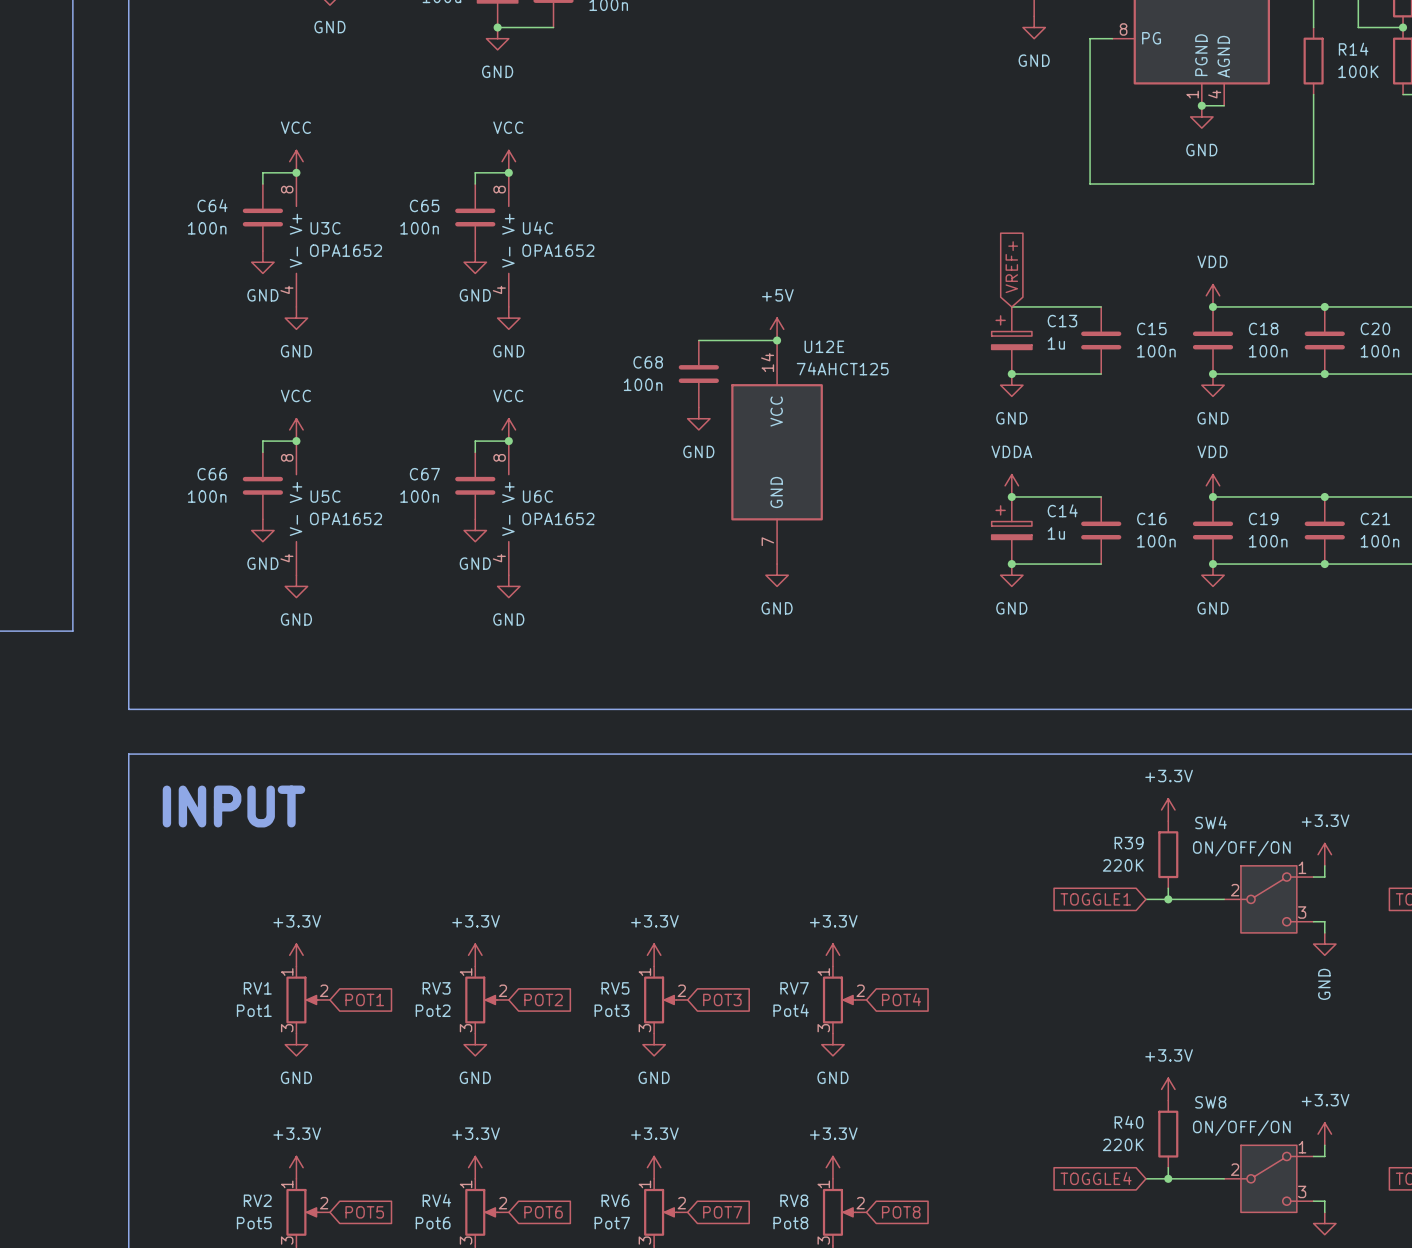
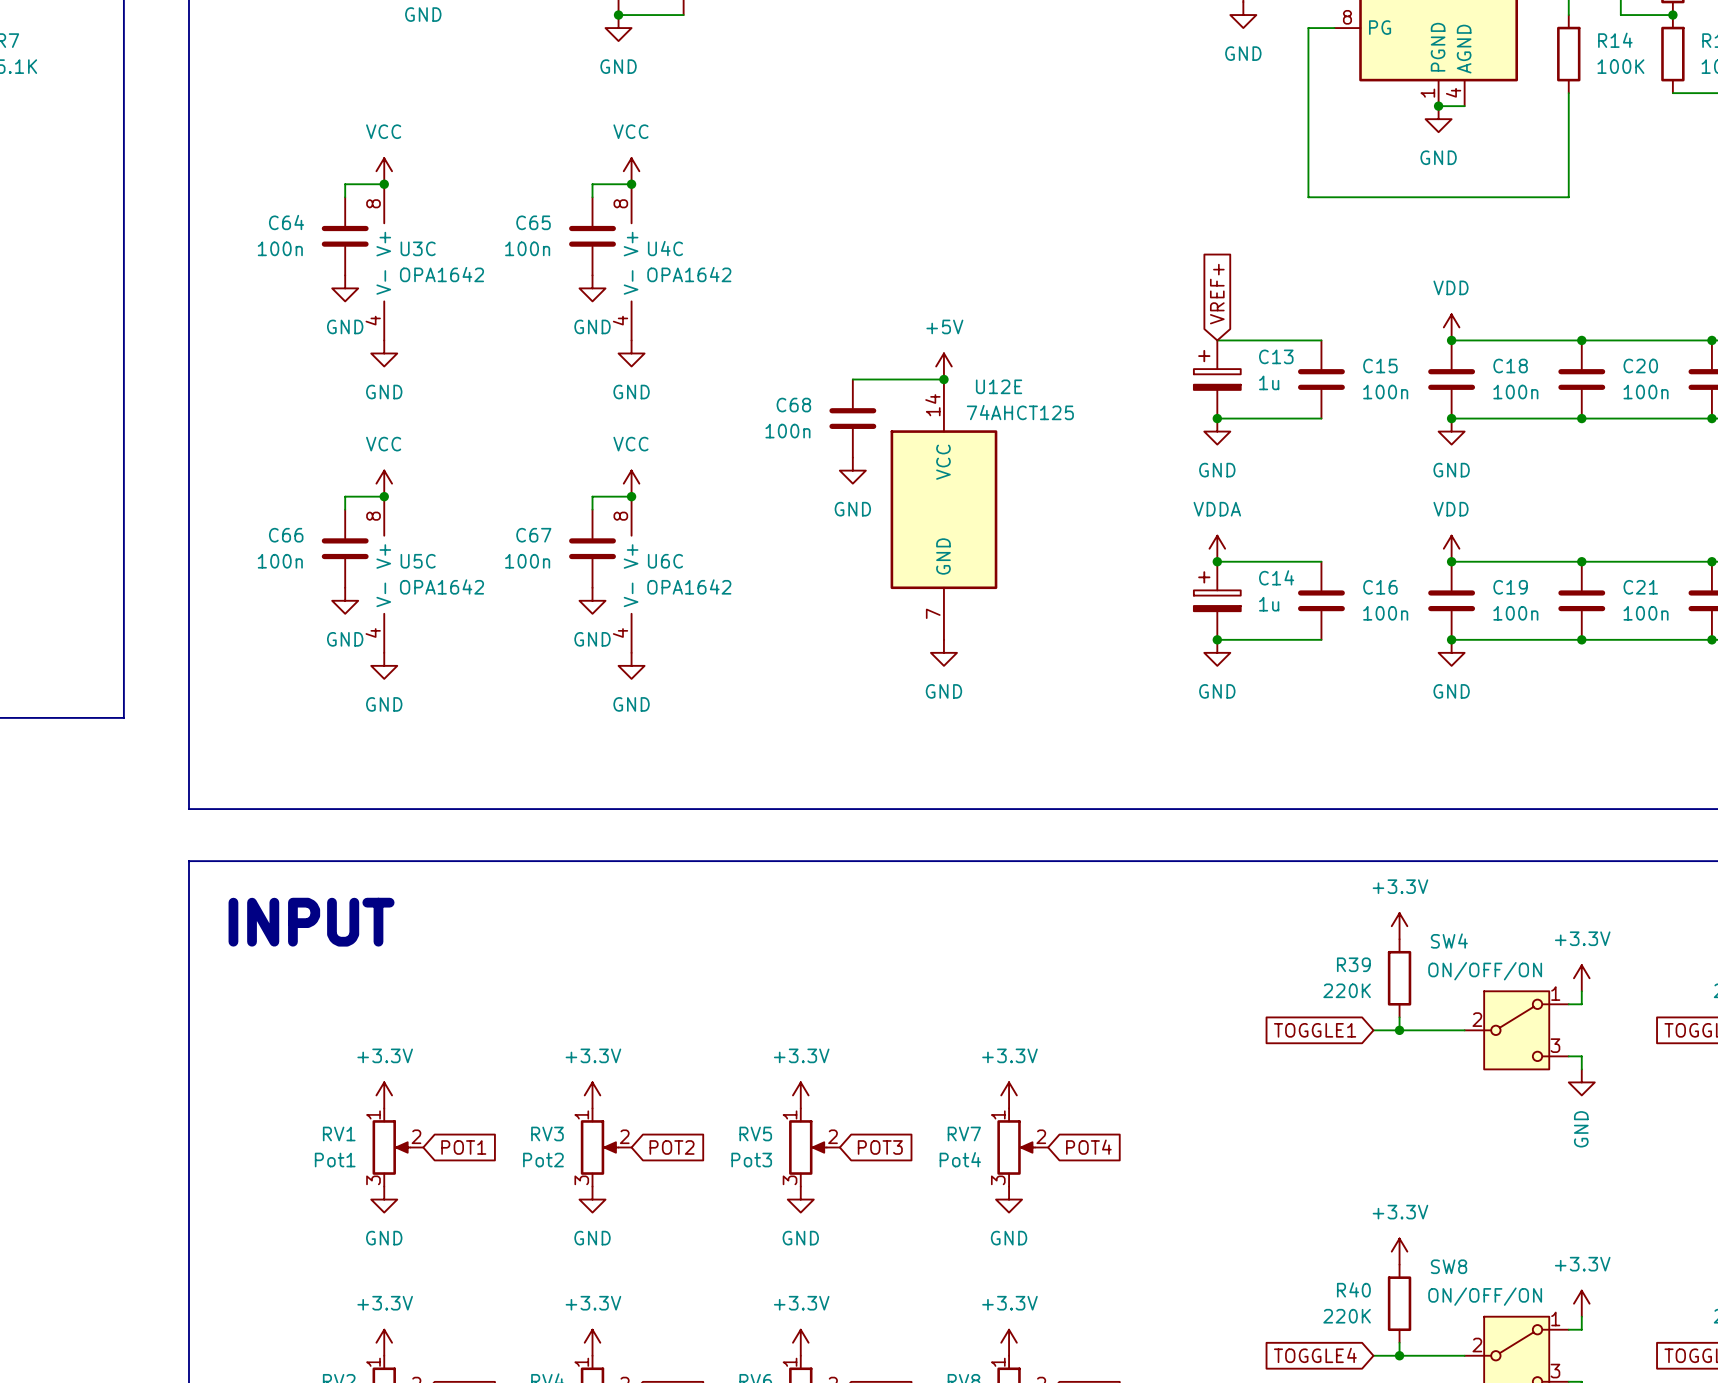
U3C value: OPA1652 (346, 250) -> OPA1642 (441, 274)
U4C value: OPA1652 (558, 250) -> OPA1642 (689, 274)
U5C value: OPA1652 (346, 518) -> OPA1642 (441, 586)
U6C value: OPA1652 (558, 518) -> OPA1642 (689, 586)

